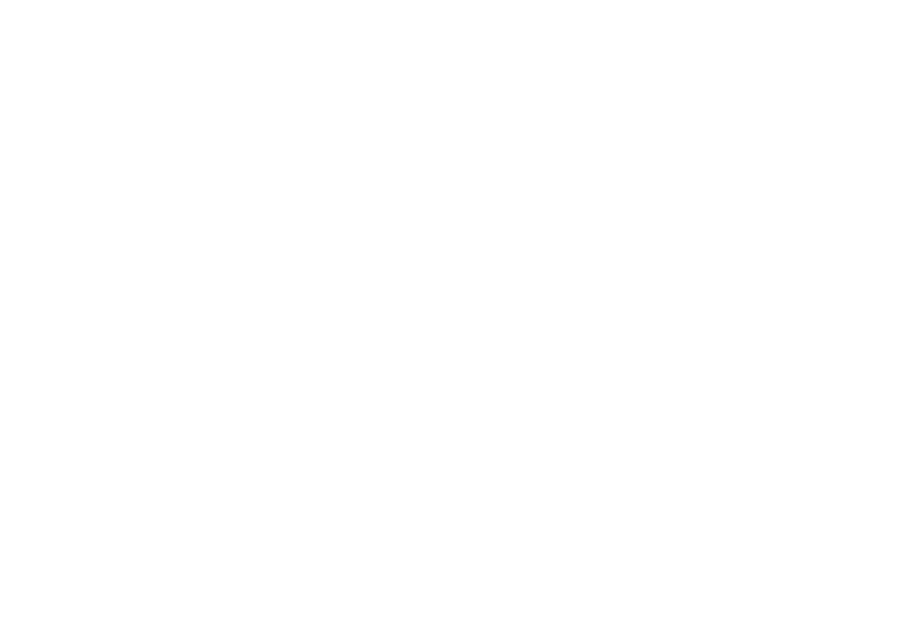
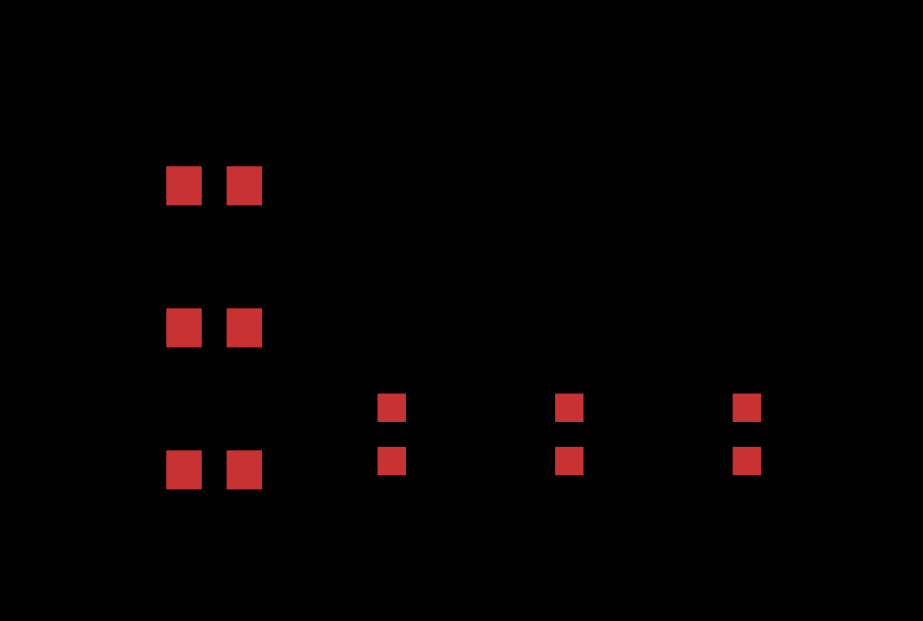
part: none -> (214, 185)
part: none -> (214, 327)
part: none -> (391, 434)
part: none -> (569, 434)
part: none -> (746, 434)
part: none -> (214, 469)

